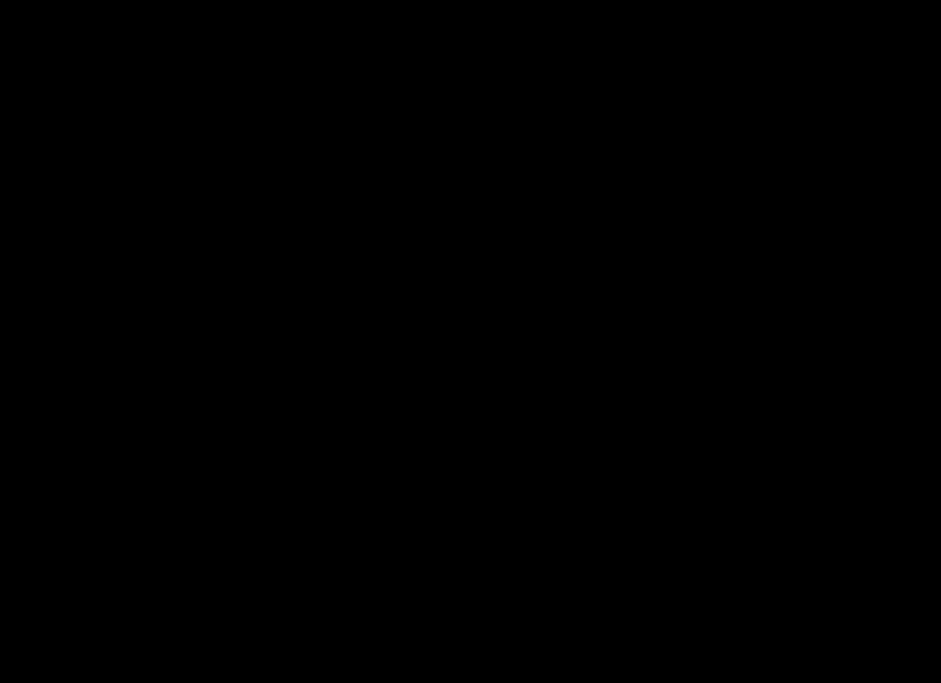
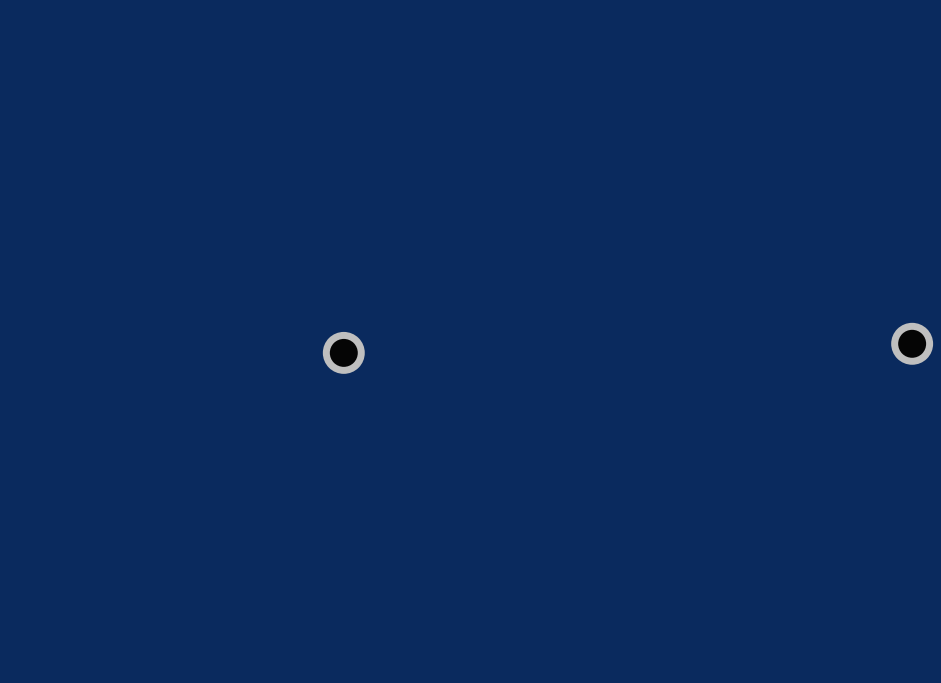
via: none -> (912, 343)
via: none -> (343, 352)

